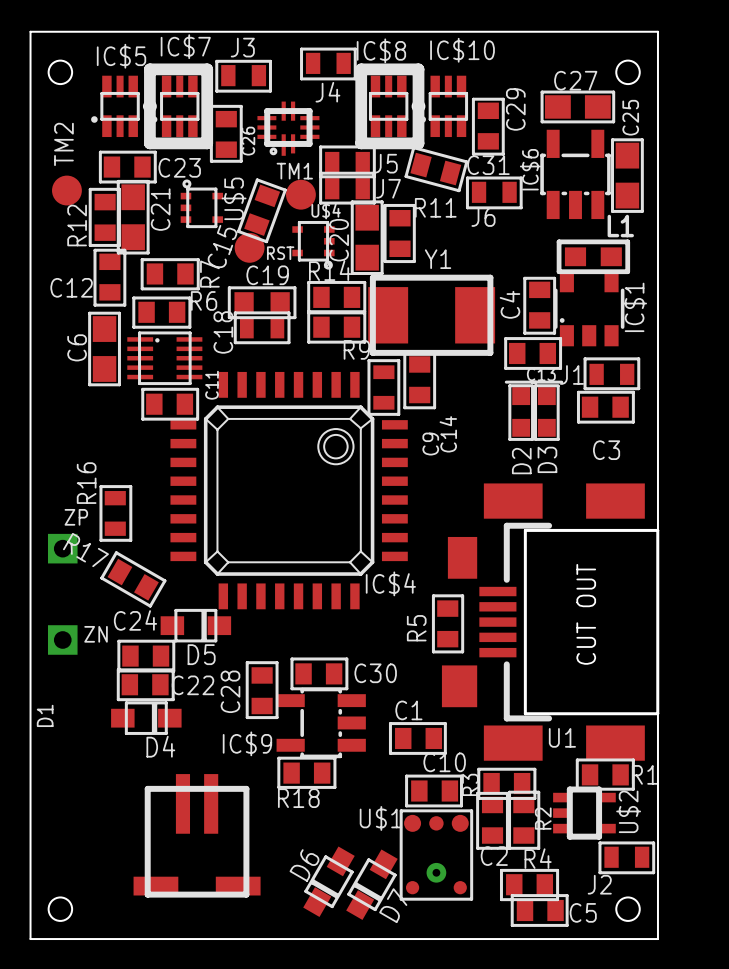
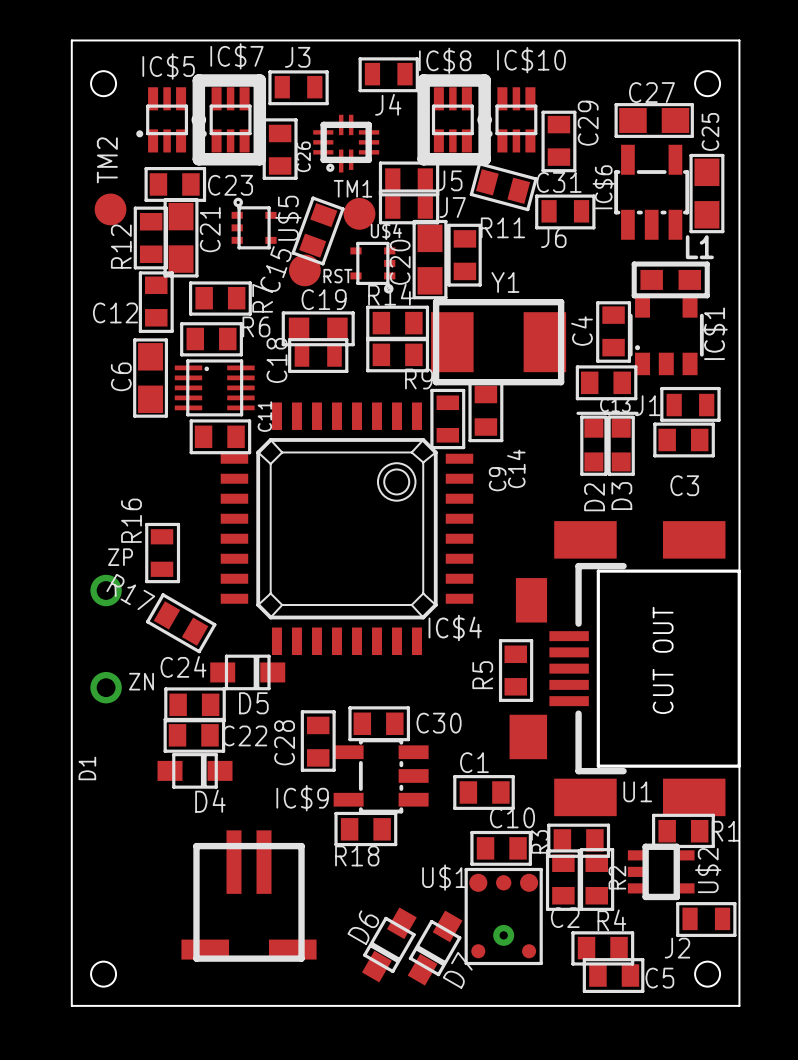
ZP footprint: [47, 533, 78, 564] -> [90, 574, 122, 607]
ZN footprint: [47, 625, 78, 655] -> [90, 671, 122, 704]

